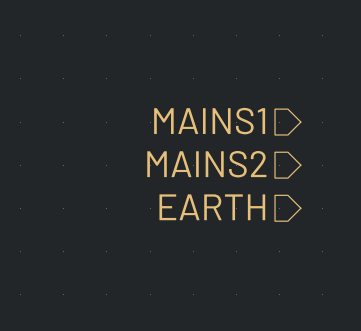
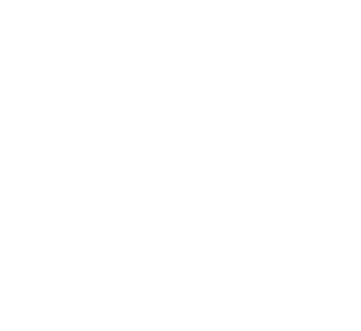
hierarchical label: MAINS1 (209, 121) -> none
hierarchical label: MAINS2 (206, 164) -> none
hierarchical label: EARTH (212, 207) -> none

